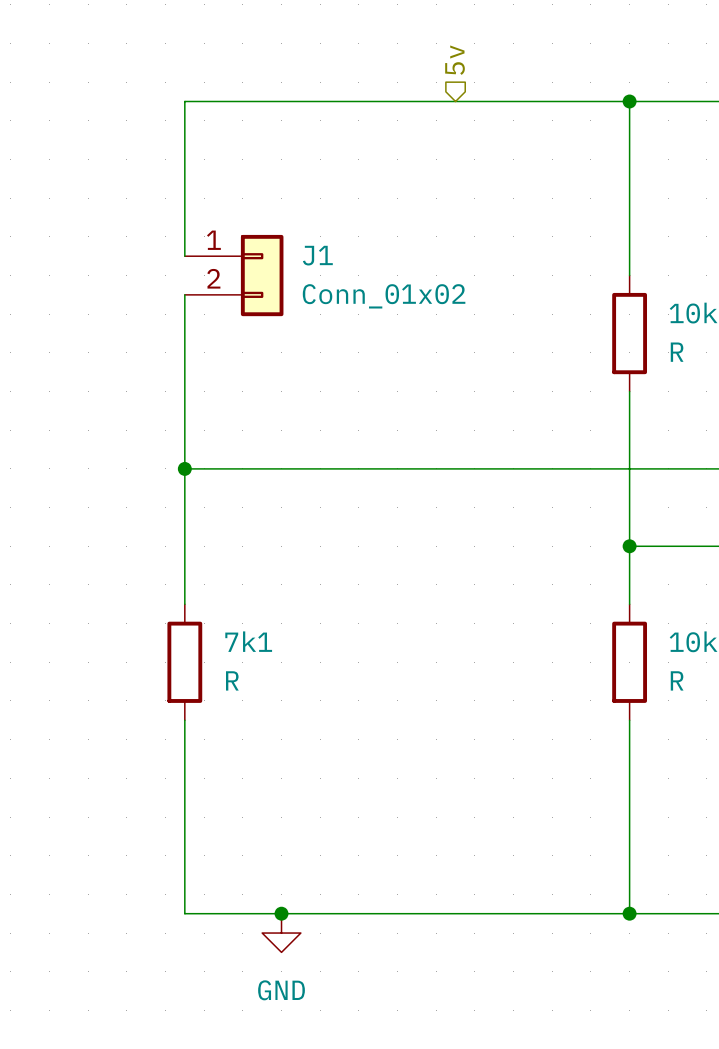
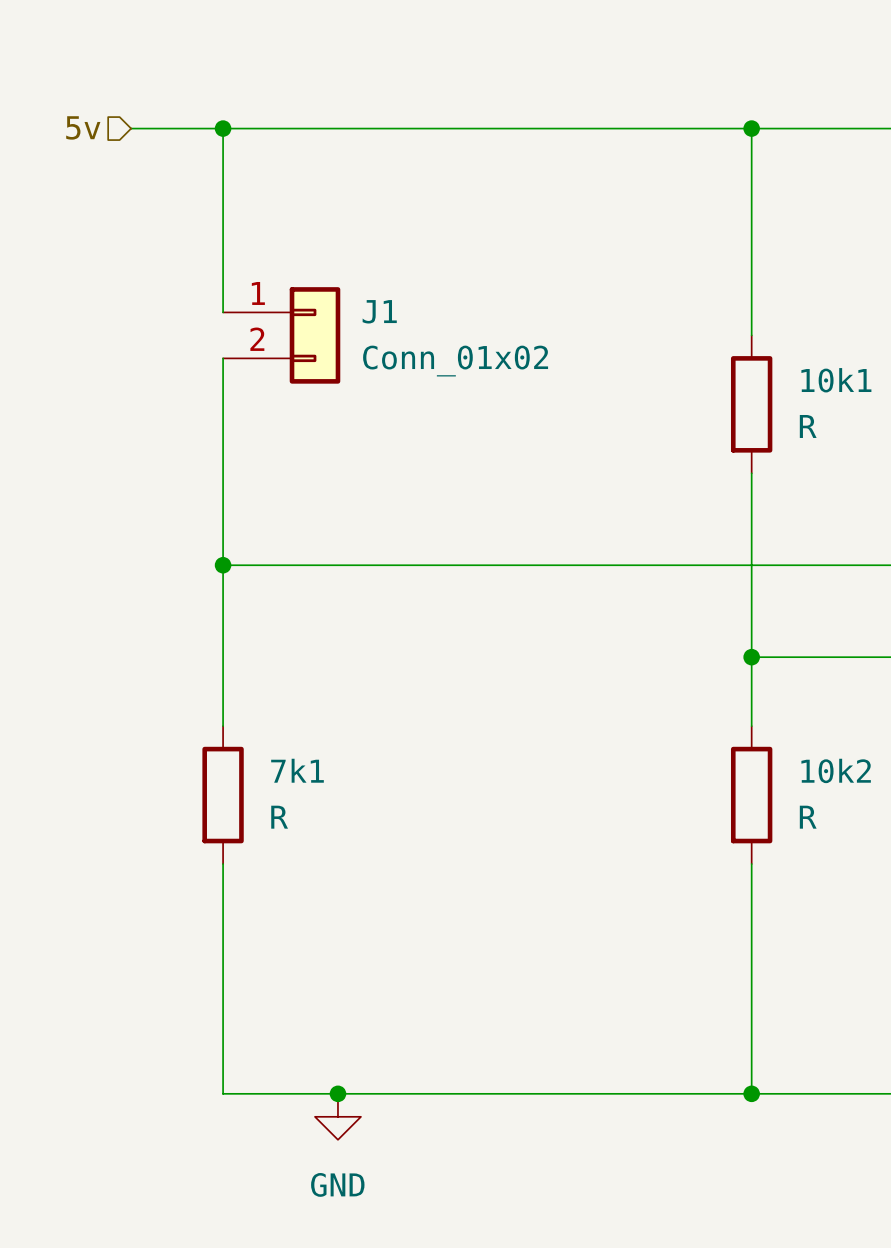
hierarchical label rotation: 0° (455, 60) -> 90° counterclockwise (83, 127)
hierarchical label position: 5v (455, 60) -> 5v (83, 127)
wire: none -> (131, 128) (223, 128)
junction: none -> (223, 128)

